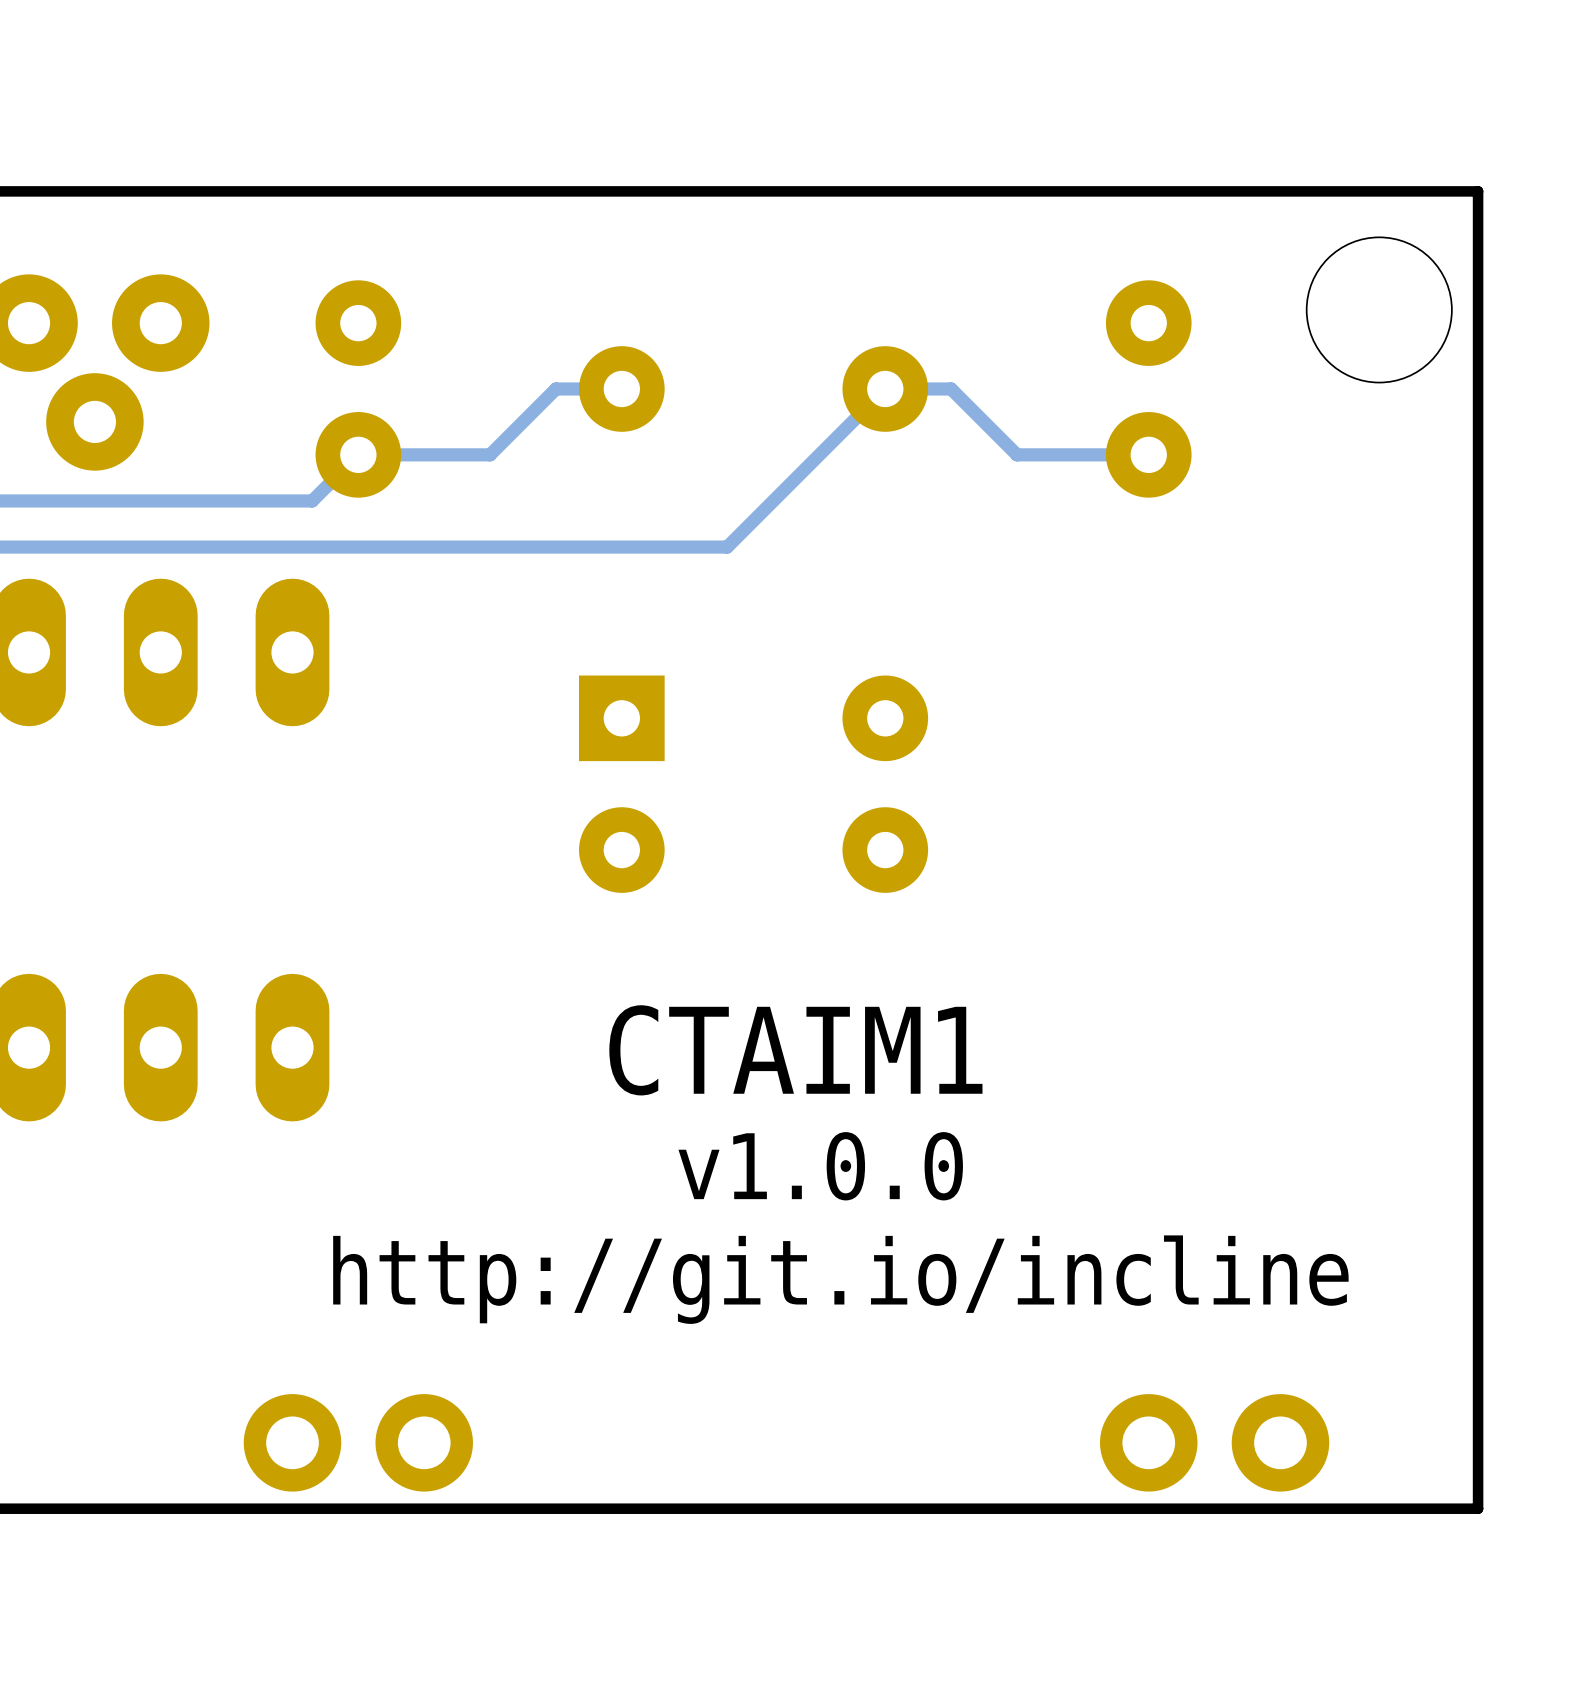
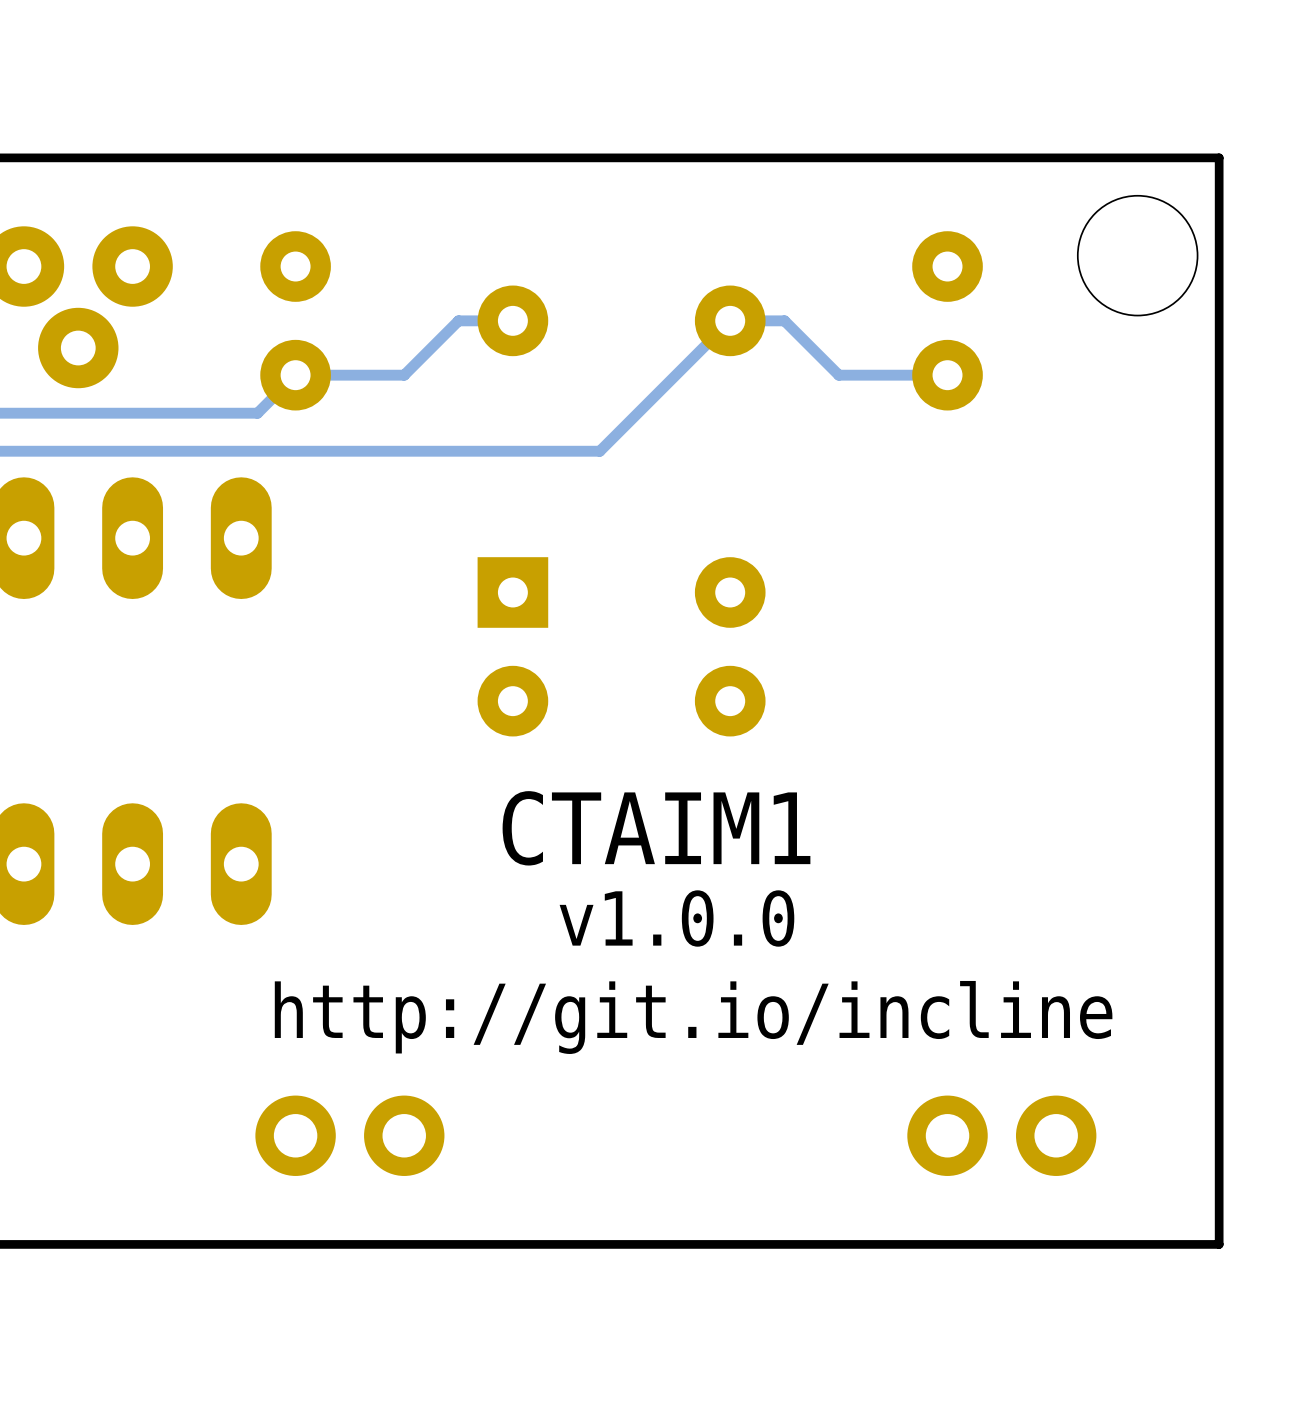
text position: CTAIM1 (795, 1050) -> CTAIM1 (656, 828)
text position: v1.0.0 (820, 1166) -> v1.0.0 (676, 918)
text position: http://git.io/incline (840, 1279) -> http://git.io/incline (693, 1017)
part position: (358, 1442) -> (349, 1135)
part position: (1214, 1442) -> (1001, 1135)

